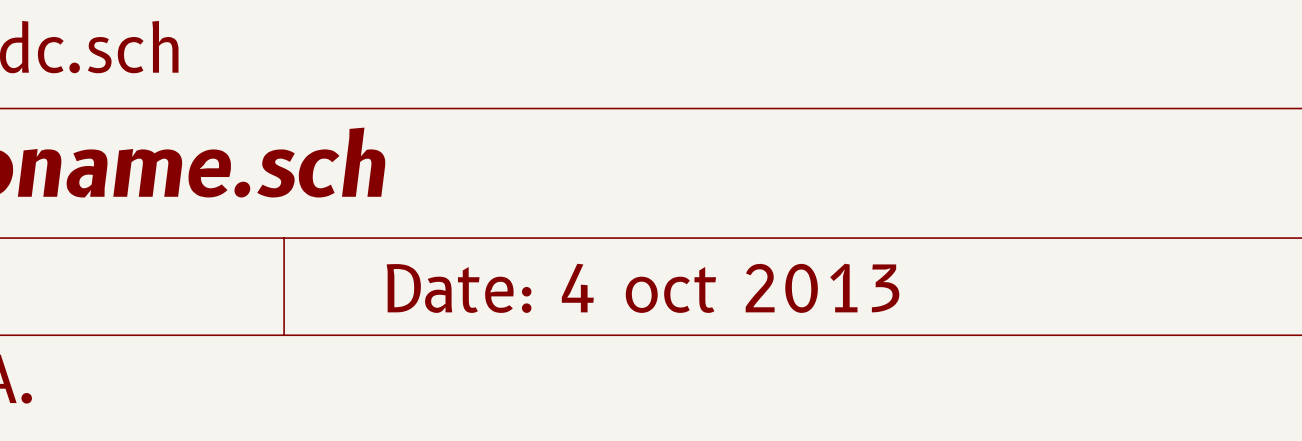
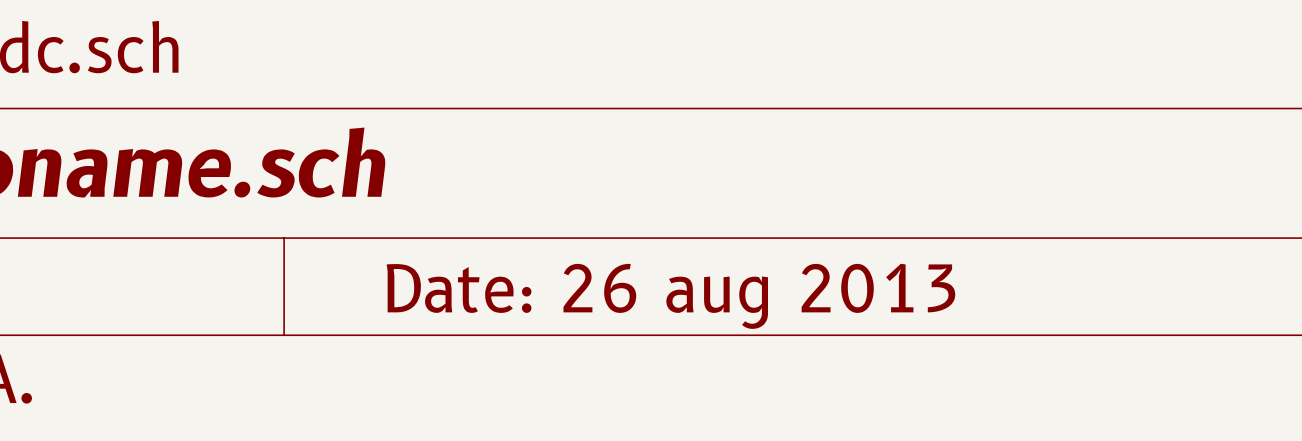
title block: Date: 4 oct 2013 (643, 288) -> Date: 26 aug 2013 (670, 296)

